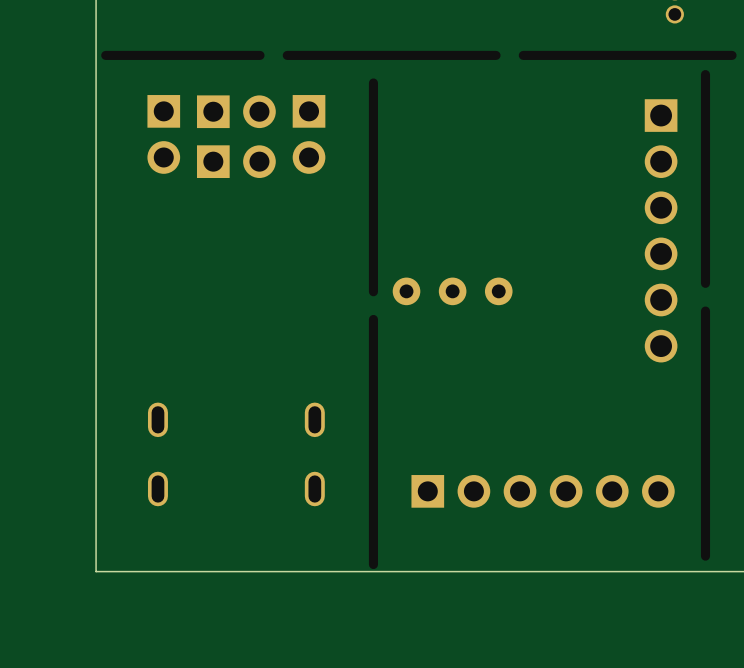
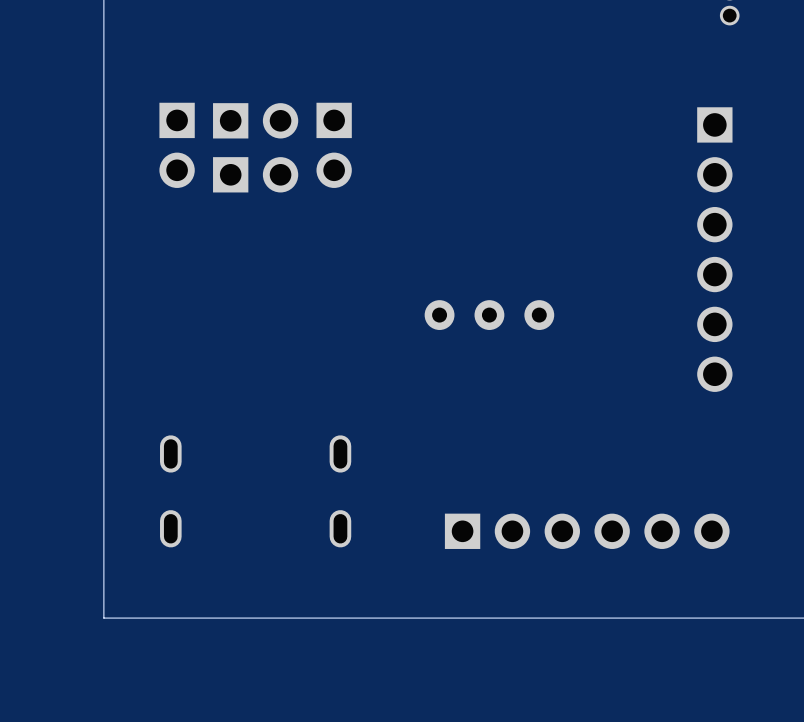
part: (182, 55) -> none
part: (391, 55) -> none
part: (627, 55) -> none
part: (705, 178) -> none
part: (373, 187) -> none
part: (705, 433) -> none
part: (373, 442) -> none

